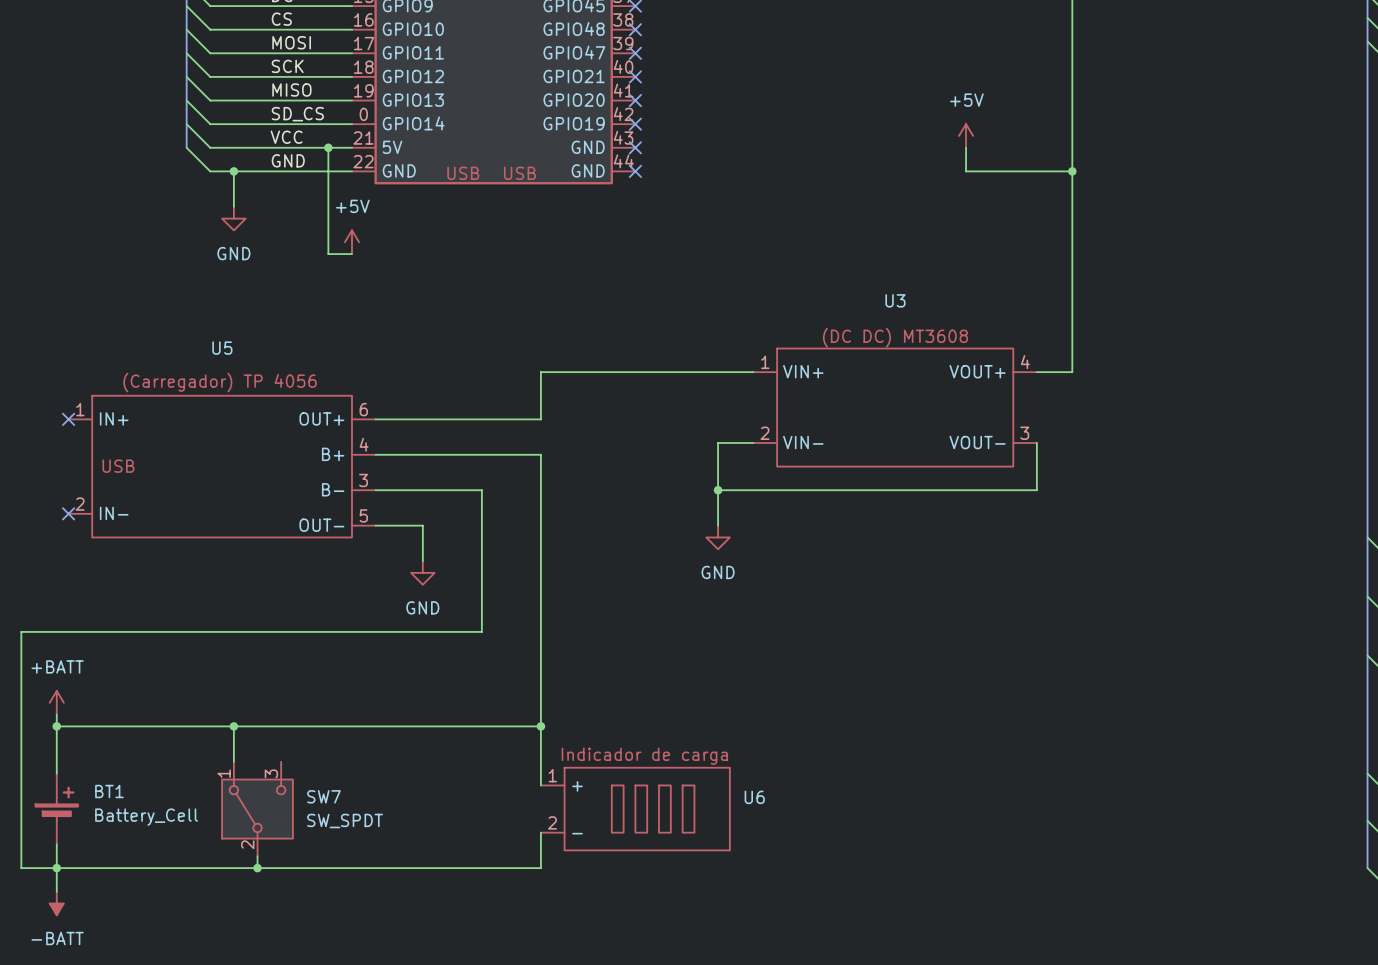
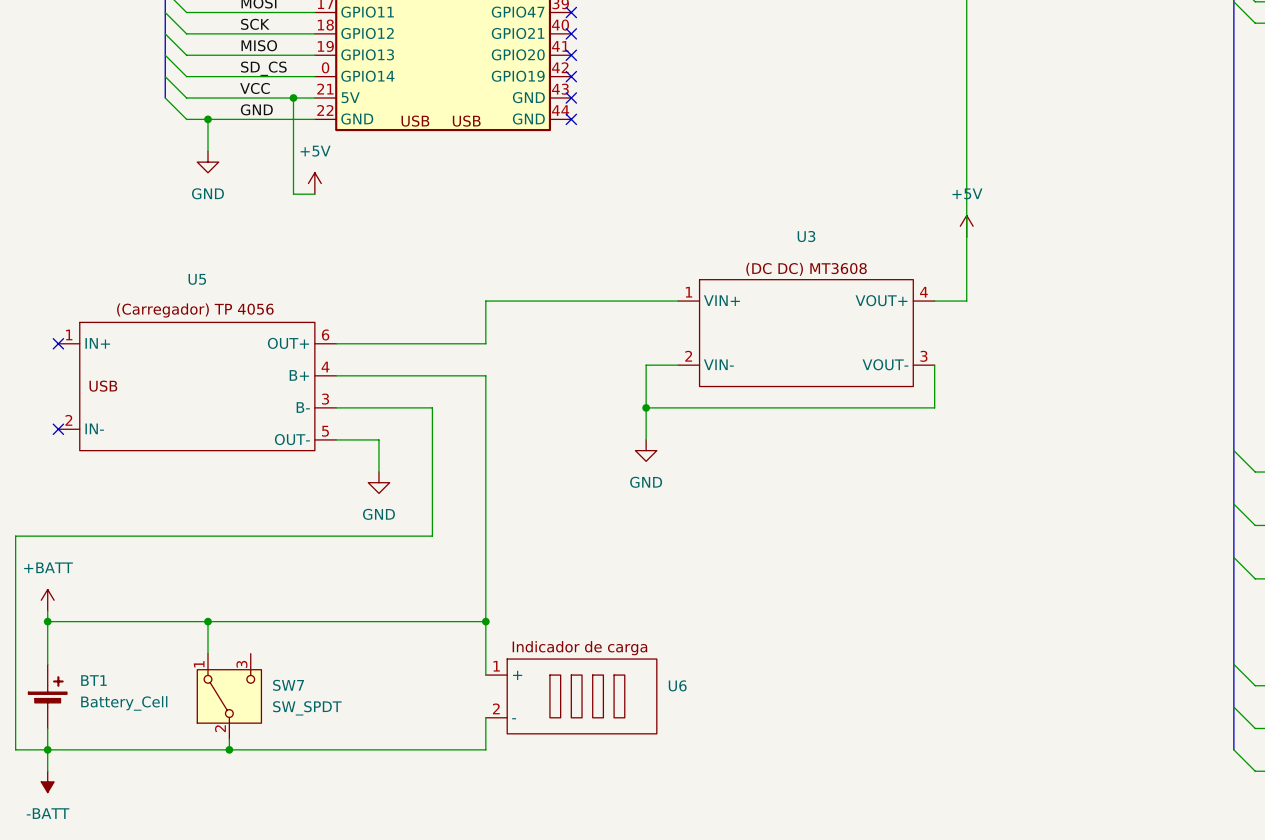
power symbol position: +5V (966, 135) -> +5V (966, 226)
wire: (966, 147) (966, 171) (1072, 171) -> none
junction: (1072, 171) -> none

